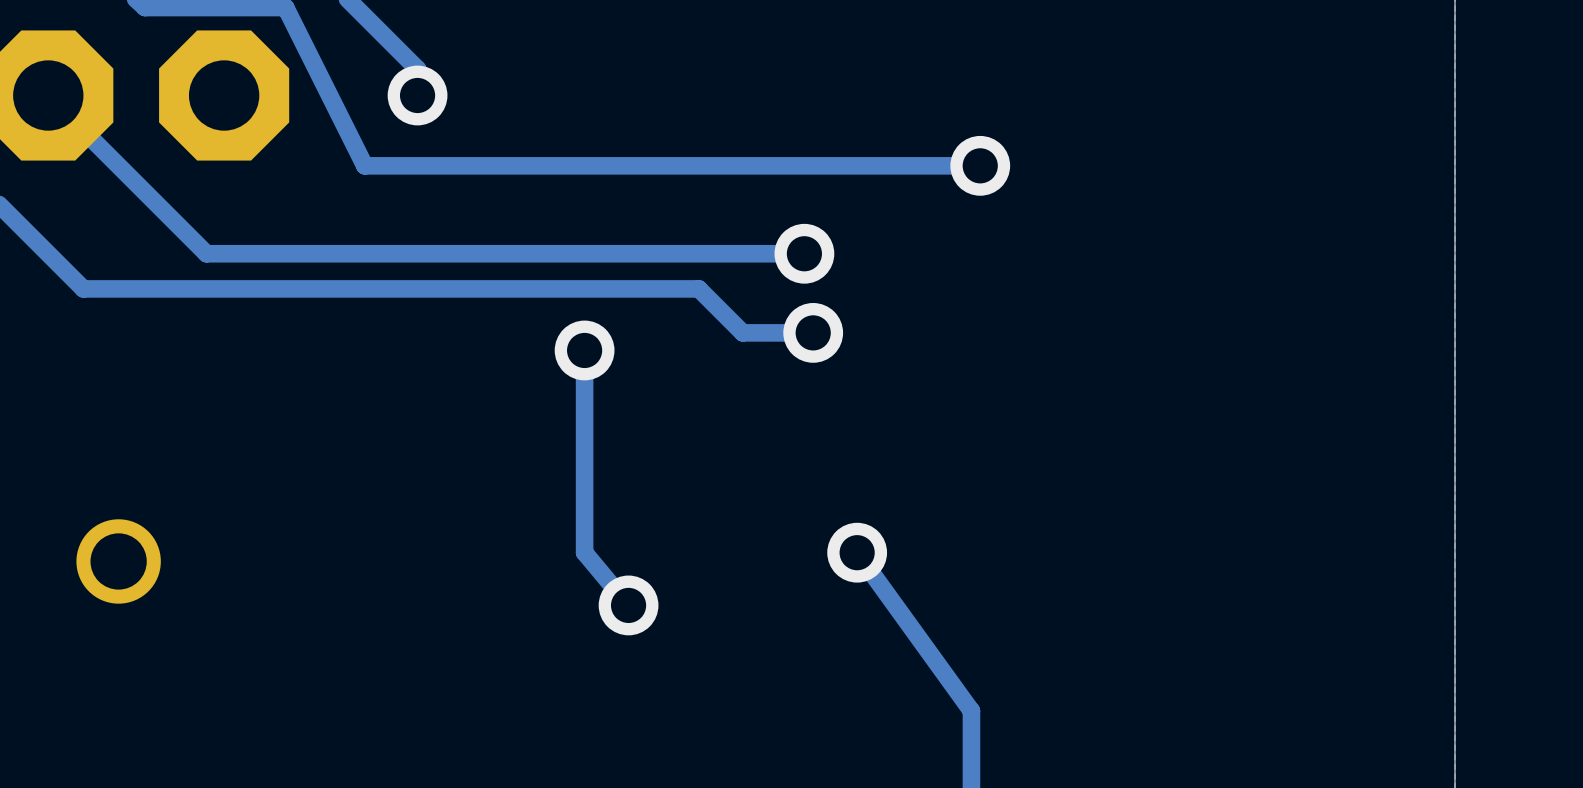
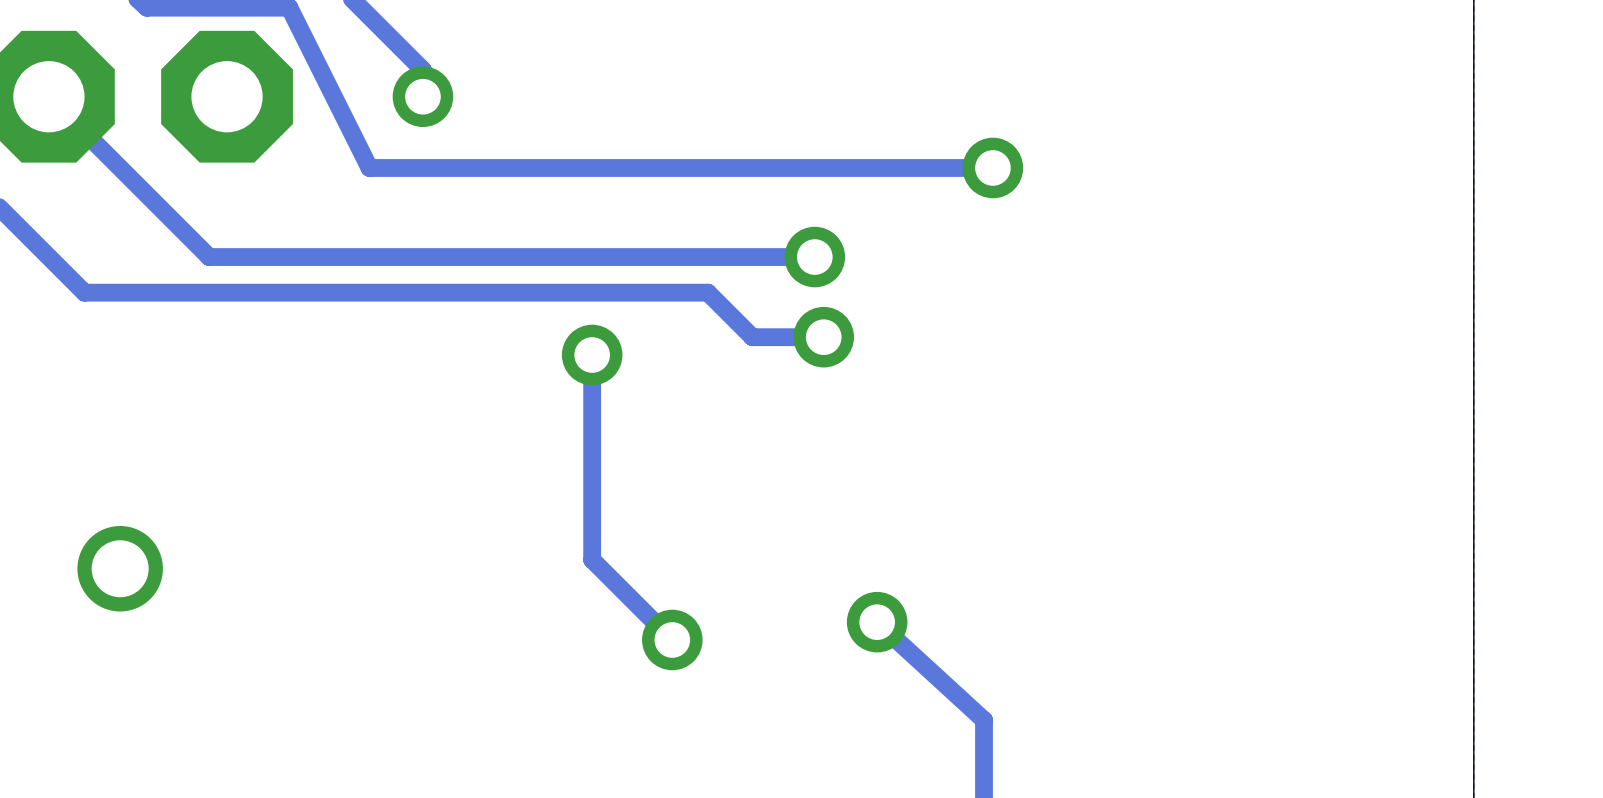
track: (584, 552) (628, 605) -> (592, 559) (672, 639)
track: (857, 552) (971, 710) -> (877, 622) (984, 720)
via position: (857, 552) -> (877, 622)
via position: (628, 605) -> (672, 639)

